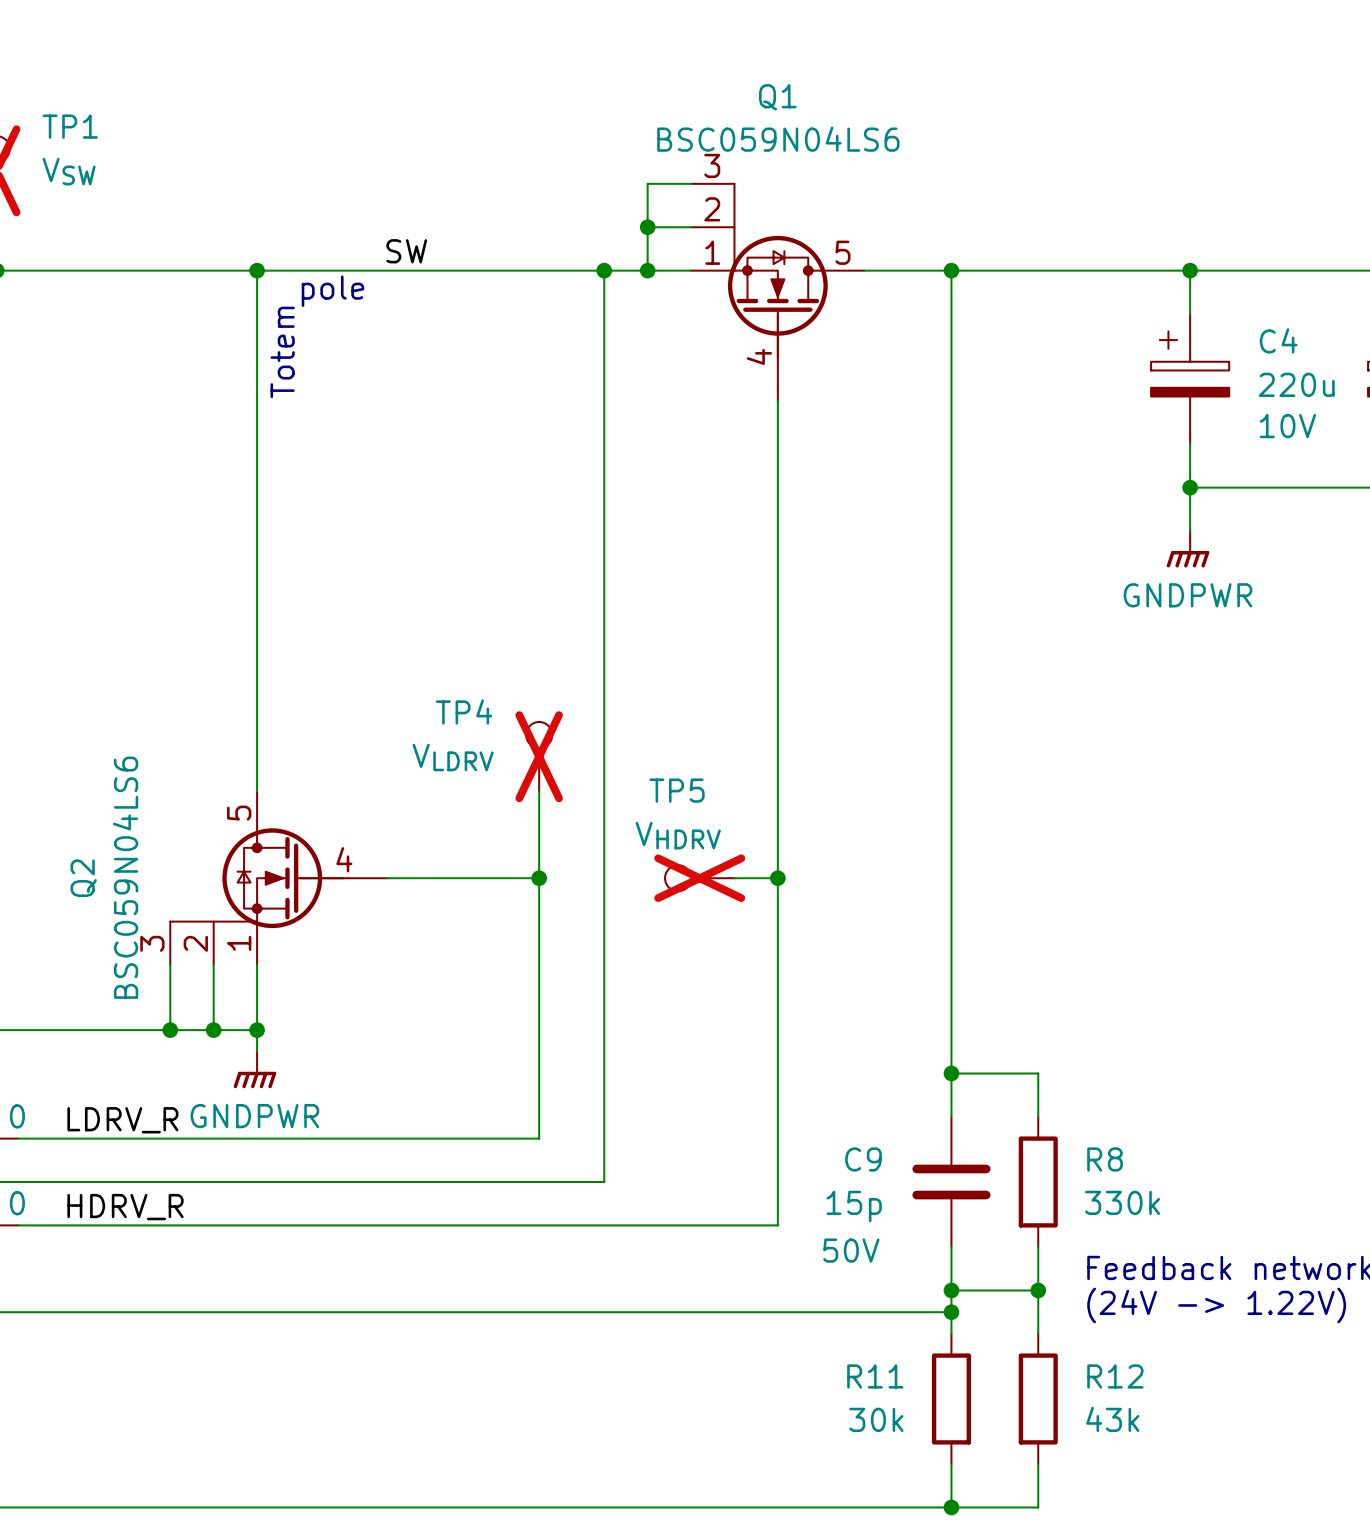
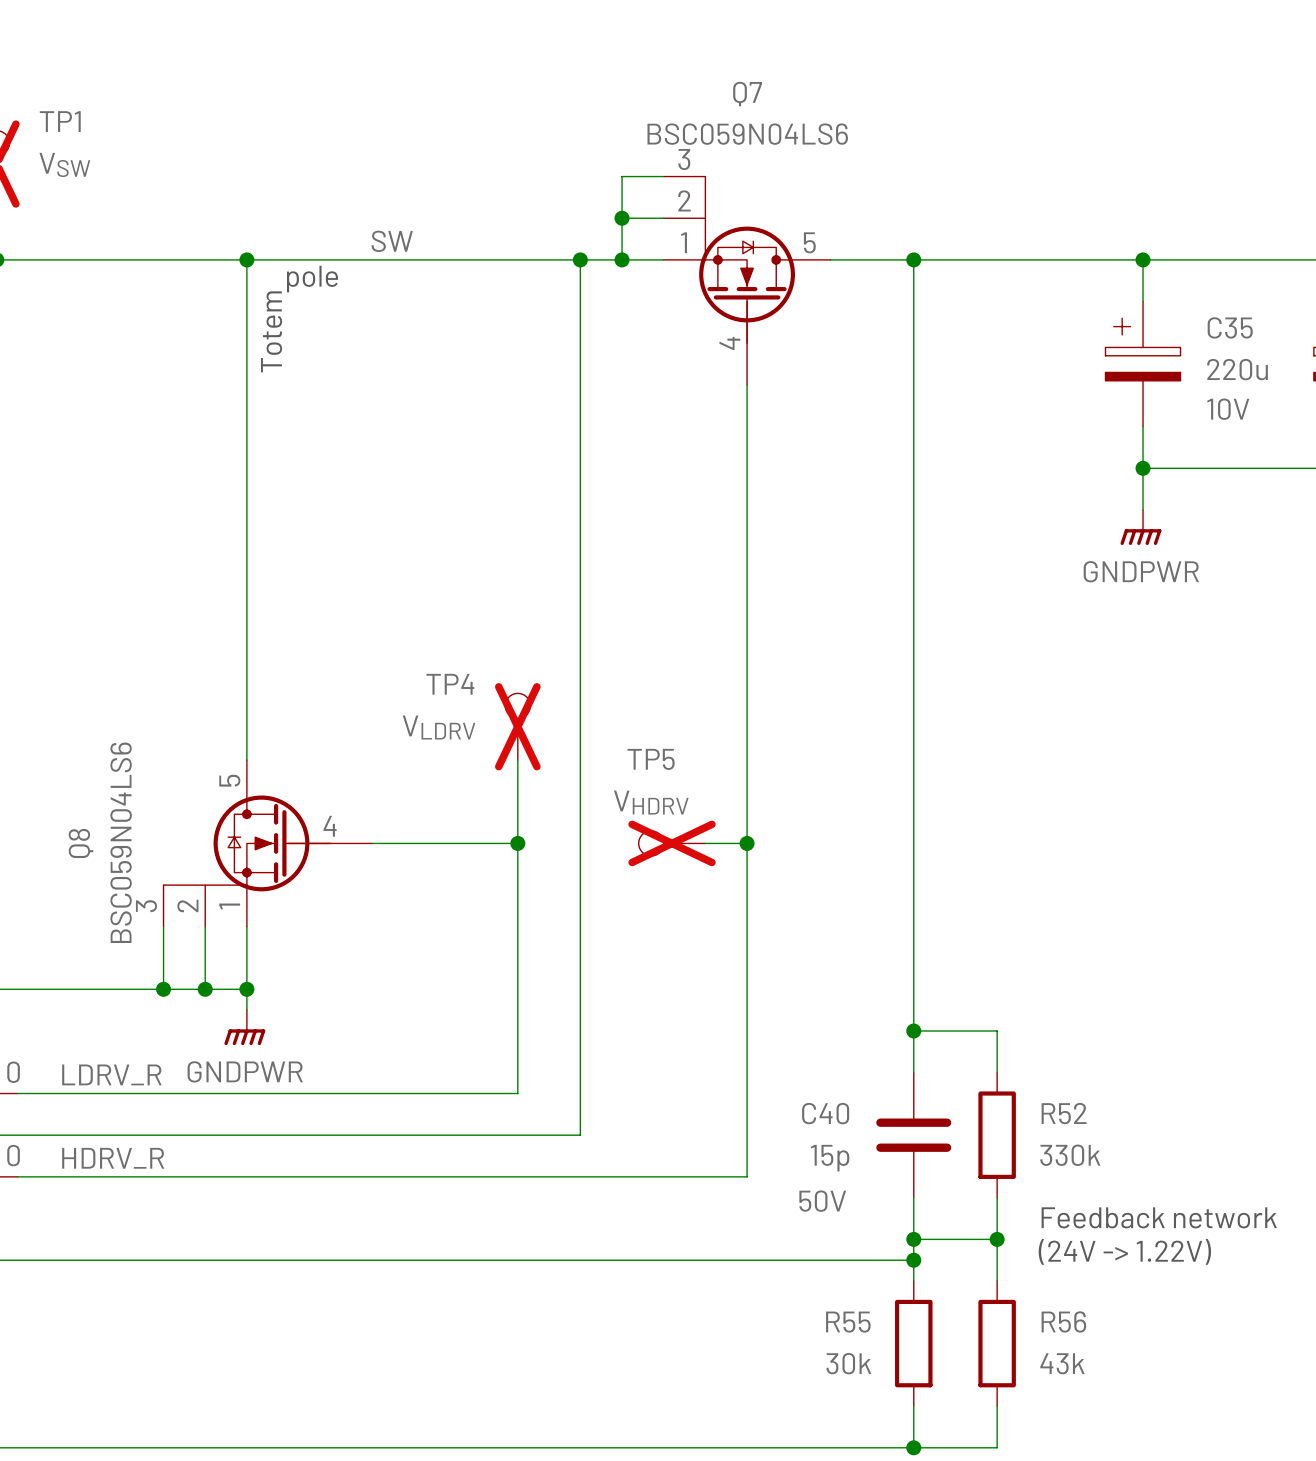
Q1 name: Q1 (777, 97) -> Q7 (747, 94)
C4 name: C4 (1278, 340) -> C35 (1230, 327)
Q2 name: Q2 (83, 878) -> Q8 (80, 843)
C9 name: C9 (863, 1159) -> C40 (825, 1113)
R8 name: R8 (1105, 1159) -> R52 (1064, 1113)
R11 name: R11 (875, 1376) -> R55 (848, 1322)
R12 name: R12 (1115, 1376) -> R56 (1063, 1321)

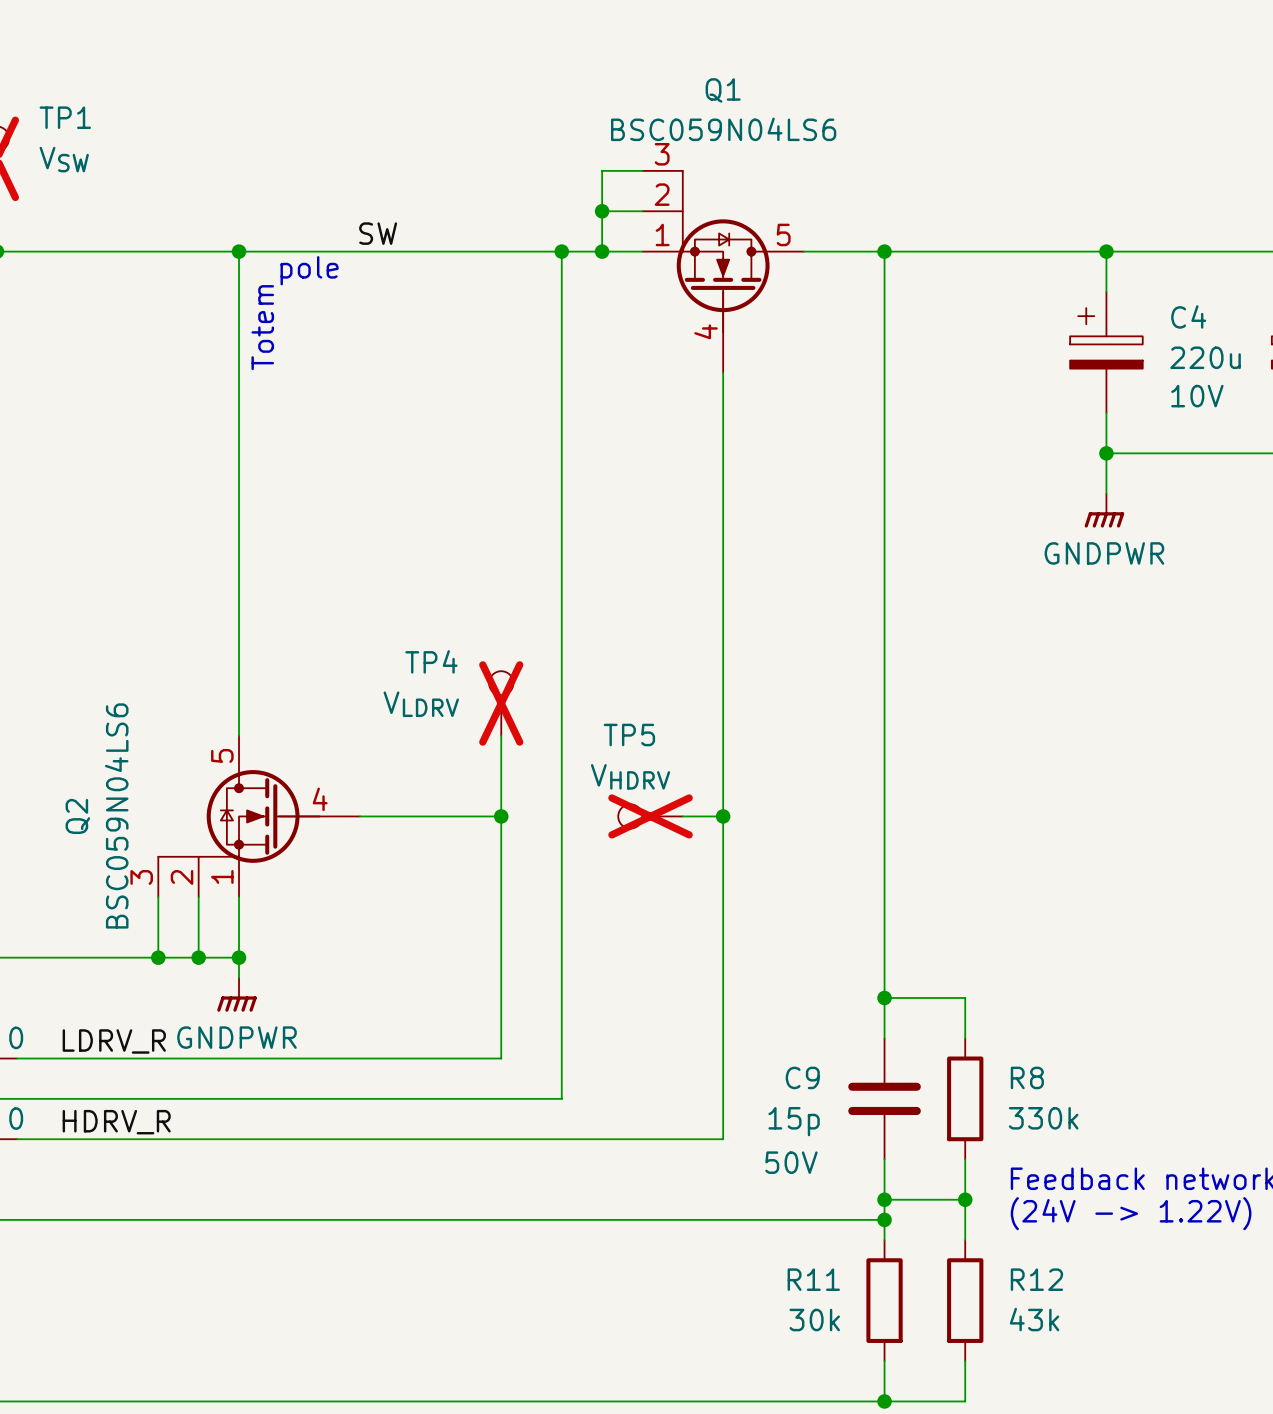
Q7 name: Q7 (747, 94) -> Q1 (723, 90)
C35 name: C35 (1230, 327) -> C4 (1188, 316)
Q8 name: Q8 (80, 843) -> Q2 (77, 816)
C40 name: C40 (825, 1113) -> C9 (802, 1077)
R52 name: R52 (1064, 1113) -> R8 (1027, 1077)
R56 name: R56 (1063, 1321) -> R12 (1036, 1279)
R55 name: R55 (848, 1322) -> R11 (813, 1279)

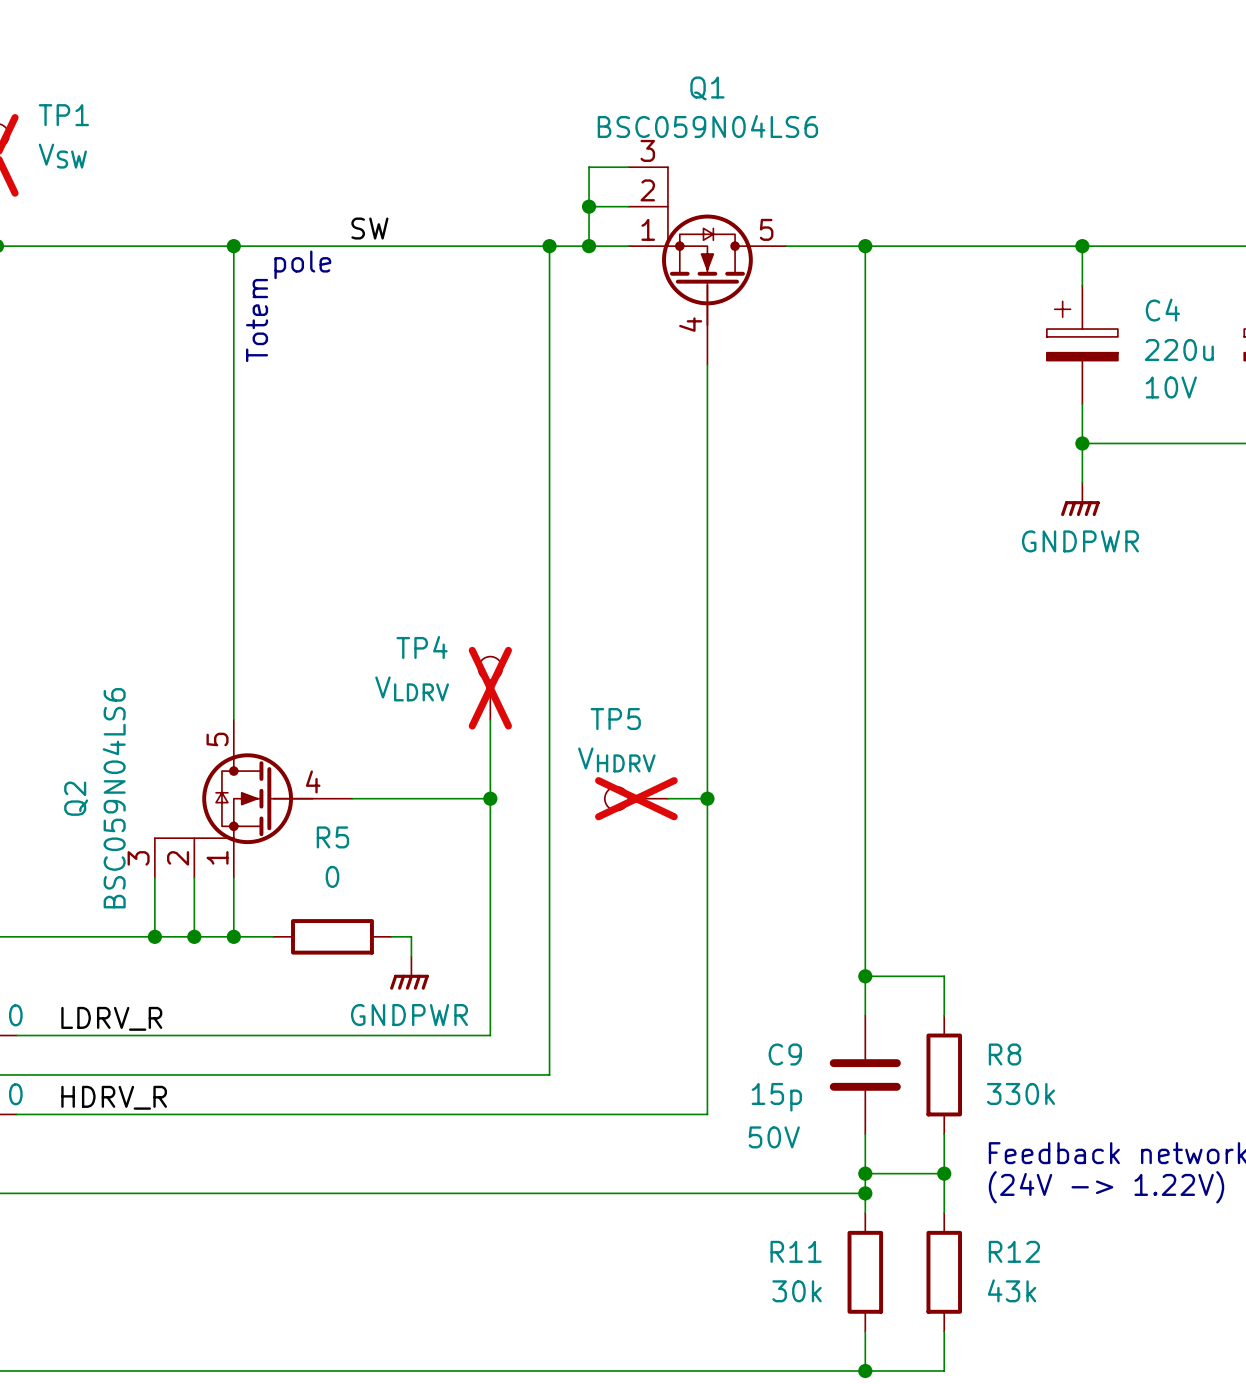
wire: (239, 957) (239, 977) -> (233, 936) (273, 936)
R5: none -> 0 (332, 936)
wire: none -> (391, 936) (411, 936) (411, 956)
power symbol position: GNDPWR (236, 994) -> GNDPWR (409, 973)

